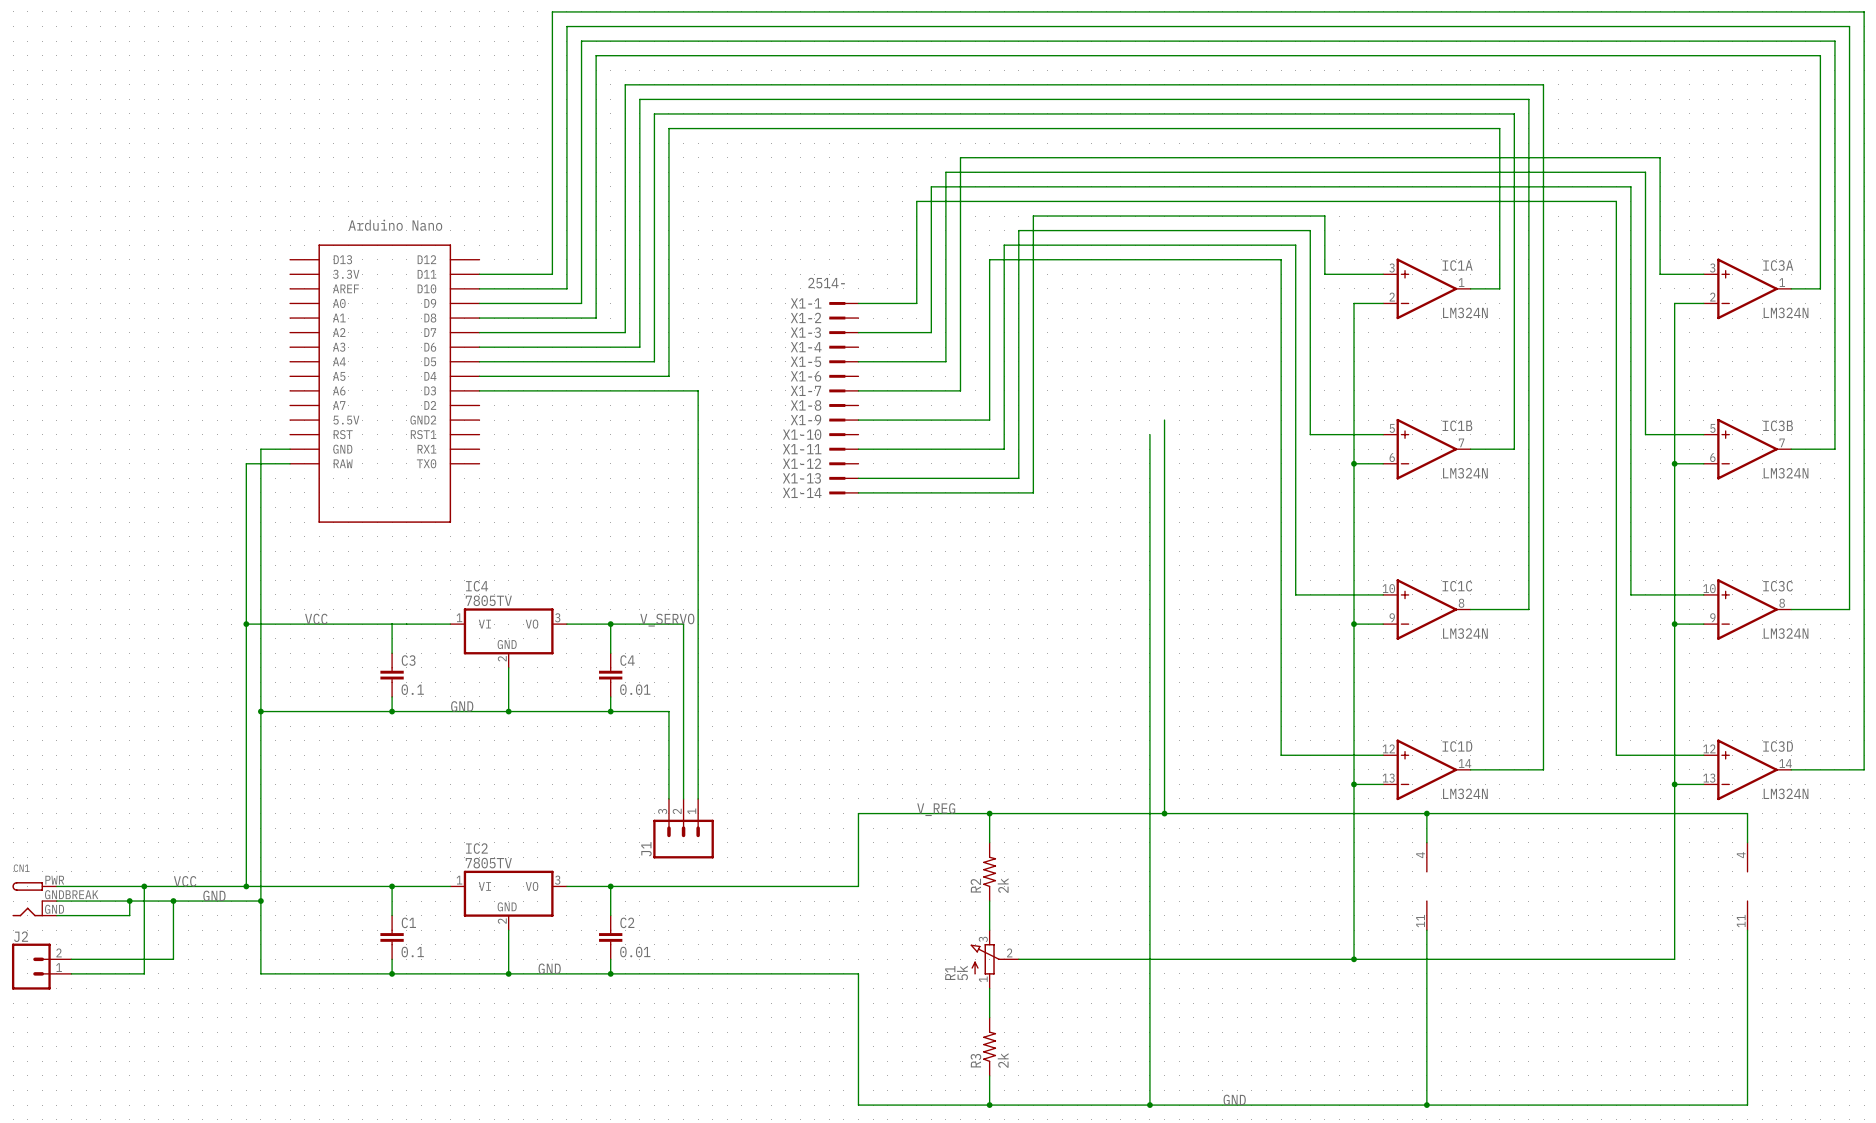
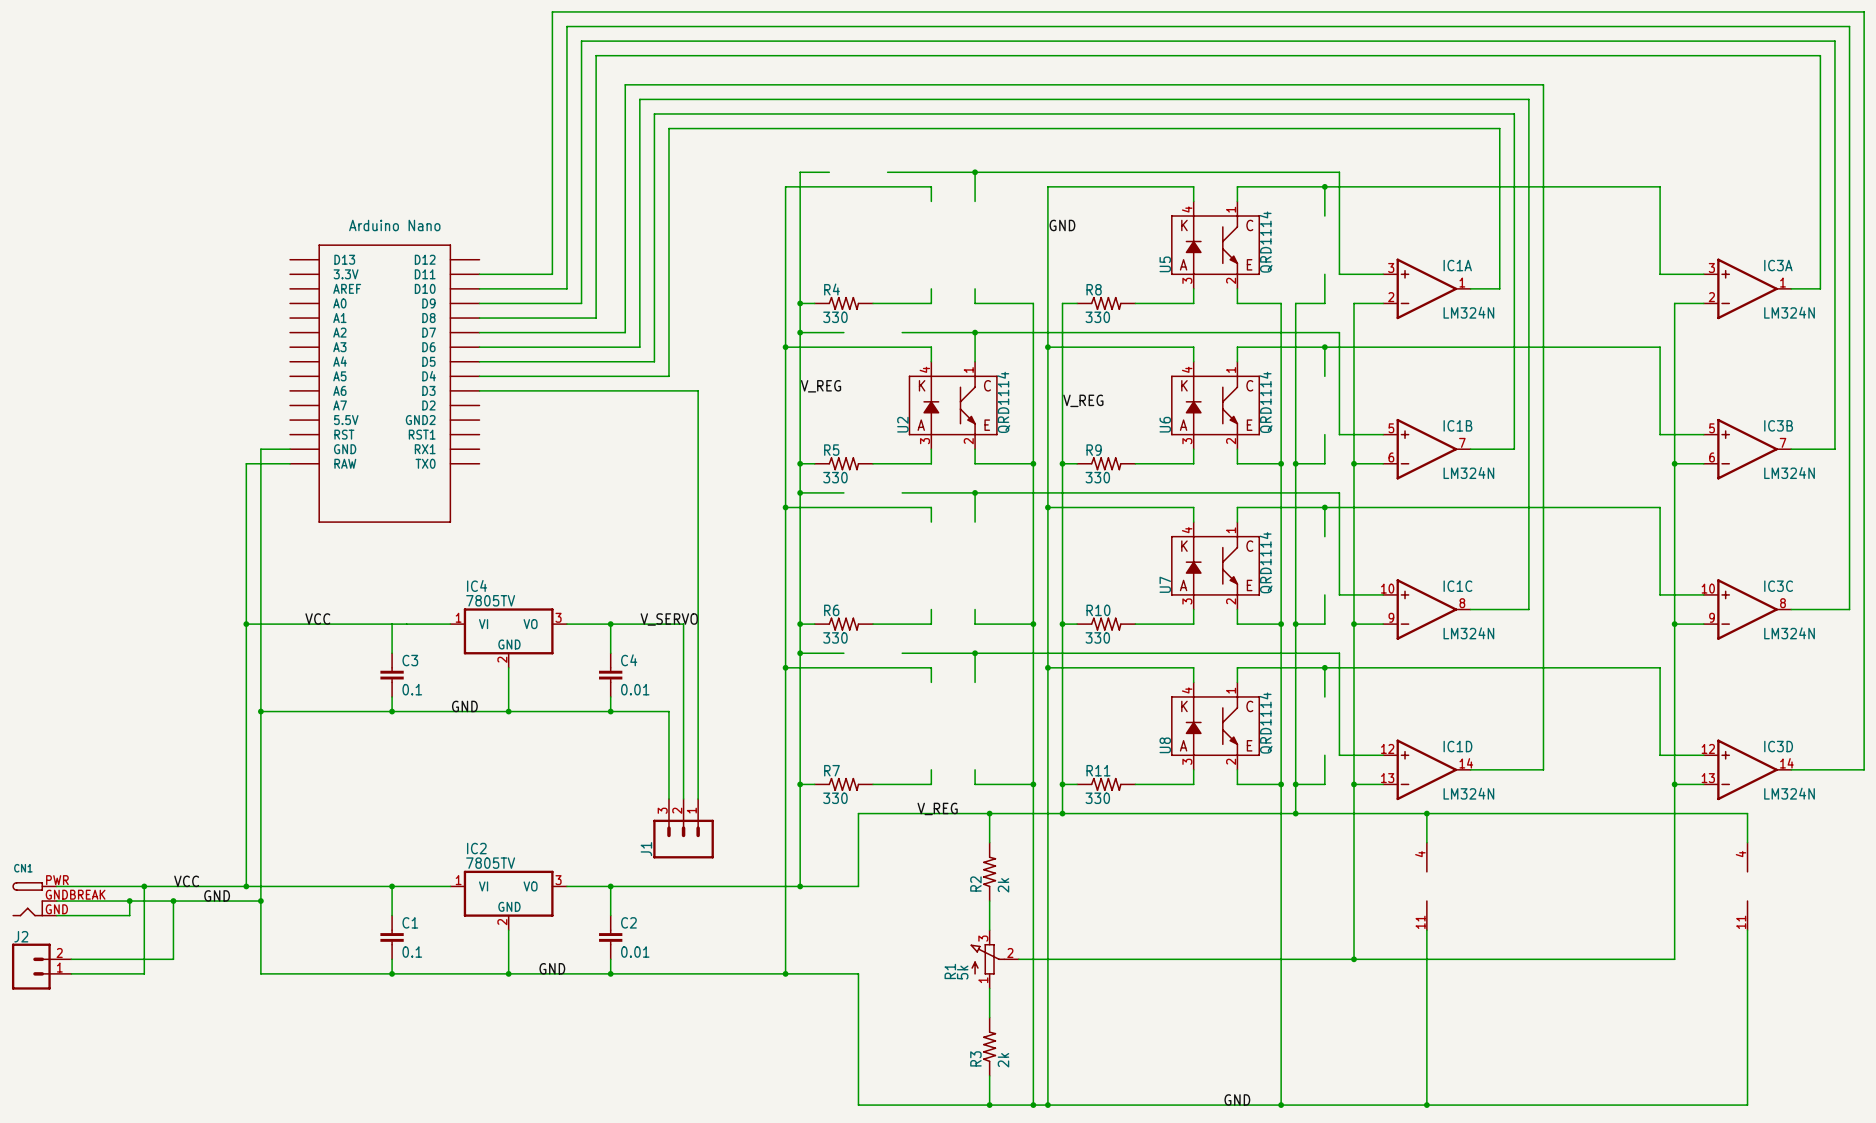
wire: none -> (829, 172) (800, 172) (800, 886)
wire: (945, 172) (945, 361) (858, 361) -> (945, 172) (887, 172)
wire: none -> (975, 172) (975, 201)
junction: none -> (975, 172)
wire: (1339, 172) (1645, 172) (1645, 434) (1660, 434) -> (1237, 361) (1237, 347) (1660, 347) (1660, 434)
wire: (931, 186) (1047, 186) -> (931, 186) (785, 186) (785, 973)
wire: none -> (1047, 186) (1047, 1105)
wire: (1193, 186) (1237, 186) -> (1193, 186) (1193, 201)
wire: none -> (1237, 186) (1237, 201)
wire: none -> (1324, 186) (1324, 216)
junction: none -> (1324, 186)
wire: (1630, 186) (1630, 594) (1660, 594) -> (1630, 186) (1660, 186)
wire: (1660, 186) (1660, 157) (960, 157) (960, 390) (858, 390) -> none
wire: (931, 201) (931, 288) -> none
label: none -> GND (1062, 225)
U5: none -> QRD1114 (1215, 245)
wire: (1339, 274) (1324, 274) (1324, 216) (1033, 216) (1033, 303) -> (1339, 274) (1339, 172)
wire: none -> (975, 288) (975, 303) (1033, 303)
wire: none -> (1193, 288) (1193, 303) (1135, 303)
junction: none -> (800, 303)
X1-1: 2514- (843, 303) -> none
R4: none -> 330 (843, 303)
wire: (916, 303) (916, 201) (1616, 201) (1616, 755) (1660, 755) -> (1237, 682) (1237, 667) (1660, 667) (1660, 755)
wire: (931, 303) (931, 332) -> (931, 303) (916, 303)
wire: none -> (1077, 303) (1062, 303) (1062, 813)
R8: none -> 330 (1106, 303)
wire: (1281, 303) (1281, 259) (989, 259) (989, 420) (858, 420) -> (1281, 303) (1237, 303) (1237, 288)
wire: (1295, 303) (1295, 245) (1004, 245) (1004, 449) (858, 449) -> (1295, 303) (1324, 303) (1324, 274)
X1-2: (843, 318) -> none
junction: none -> (800, 332)
X1-3: (843, 332) -> none
wire: (858, 332) (902, 332) -> (800, 332) (843, 332)
wire: none -> (975, 332) (975, 361)
junction: none -> (975, 332)
wire: none -> (785, 347) (931, 347) (931, 361)
junction: none -> (785, 347)
X1-4: (843, 347) -> none
wire: none -> (1047, 347) (1193, 347) (1193, 361)
junction: none -> (1047, 347)
wire: none -> (1324, 347) (1324, 376)
junction: none -> (1324, 347)
X1-5: (843, 361) -> none
X1-6: (843, 376) -> none
label: none -> V_REG (821, 386)
X1-7: (843, 390) -> none
label: none -> V_REG (1083, 400)
X1-8: (843, 405) -> none
U2: none -> QRD1114 (953, 405)
U6: none -> QRD1114 (1215, 405)
X1-9: (843, 420) -> none
wire: (1164, 420) (1164, 813) -> none
X1-10: (843, 434) -> none
wire: (1149, 434) (1149, 1105) -> none
wire: none -> (1324, 434) (1324, 463) (1295, 463)
wire: (1339, 434) (1310, 434) (1310, 230) (1018, 230) (1018, 478) (858, 478) -> (1339, 434) (1339, 332) (931, 332)
X1-11: (843, 449) -> none
wire: none -> (931, 449) (931, 463) (873, 463)
wire: none -> (975, 449) (975, 463) (1033, 463)
wire: none -> (1193, 449) (1193, 463) (1135, 463)
wire: none -> (1237, 449) (1237, 463) (1281, 463)
wire: none -> (800, 463) (814, 463)
junction: none -> (800, 463)
X1-12: (843, 463) -> none
R5: none -> 330 (843, 463)
junction: none -> (1033, 463)
wire: none -> (1062, 463) (1077, 463)
junction: none -> (1062, 463)
R9: none -> 330 (1106, 463)
junction: none -> (1281, 463)
junction: none -> (1295, 463)
X1-13: (843, 478) -> none
junction: none -> (800, 492)
X1-14: (843, 492) -> none
wire: (858, 492) (902, 492) -> (800, 492) (843, 492)
wire: none -> (975, 492) (975, 522)
junction: none -> (975, 492)
wire: none -> (785, 507) (931, 507) (931, 522)
junction: none -> (785, 507)
wire: none -> (1047, 507) (1193, 507) (1193, 522)
junction: none -> (1047, 507)
wire: none -> (1324, 507) (1324, 536)
junction: none -> (1324, 507)
wire: none -> (1237, 522) (1237, 507) (1660, 507) (1660, 594)
U7: none -> QRD1114 (1215, 565)
wire: (1295, 594) (1339, 594) -> (1295, 594) (1295, 813)
wire: none -> (1324, 594) (1324, 624) (1295, 624)
wire: none -> (1339, 594) (1339, 492) (1033, 492) (1033, 1105)
wire: none -> (931, 609) (931, 624) (873, 624)
wire: none -> (975, 609) (975, 624) (1033, 624)
wire: none -> (1193, 609) (1193, 624) (1135, 624)
wire: none -> (1237, 609) (1237, 624) (1281, 624)
wire: none -> (800, 624) (814, 624)
junction: none -> (800, 624)
R6: none -> 330 (843, 624)
junction: none -> (1033, 624)
wire: none -> (1062, 624) (1077, 624)
junction: none -> (1062, 624)
R10: none -> 330 (1106, 624)
junction: none -> (1281, 624)
junction: none -> (1295, 624)
wire: none -> (800, 653) (843, 653)
junction: none -> (800, 653)
wire: none -> (902, 653) (1339, 653) (1339, 755)
wire: none -> (975, 653) (975, 682)
junction: none -> (975, 653)
wire: none -> (785, 667) (931, 667) (931, 682)
junction: none -> (785, 667)
wire: none -> (1047, 667) (1193, 667) (1193, 682)
junction: none -> (1047, 667)
wire: none -> (1324, 667) (1324, 696)
junction: none -> (1324, 667)
U8: none -> QRD1114 (1215, 726)
wire: (1281, 755) (1339, 755) -> (1281, 755) (1281, 1105)
wire: none -> (1324, 755) (1324, 784) (1295, 784)
wire: none -> (931, 769) (931, 784) (873, 784)
wire: none -> (975, 769) (975, 784) (1033, 784)
wire: none -> (1193, 769) (1193, 784) (1135, 784)
wire: none -> (1237, 769) (1237, 784) (1281, 784)
wire: none -> (800, 784) (814, 784)
junction: none -> (800, 784)
R7: none -> 330 (843, 784)
junction: none -> (1033, 784)
wire: none -> (1062, 784) (1077, 784)
junction: none -> (1062, 784)
R11: none -> 330 (1106, 784)
junction: none -> (1281, 784)
junction: none -> (1295, 784)
junction: none -> (1062, 813)
junction: (1164, 813) -> none
junction: none -> (1295, 813)
junction: none -> (800, 886)
junction: none -> (785, 973)
junction: none -> (1033, 1105)
junction: none -> (1047, 1105)
junction: (1149, 1105) -> none
junction: none -> (1281, 1105)

